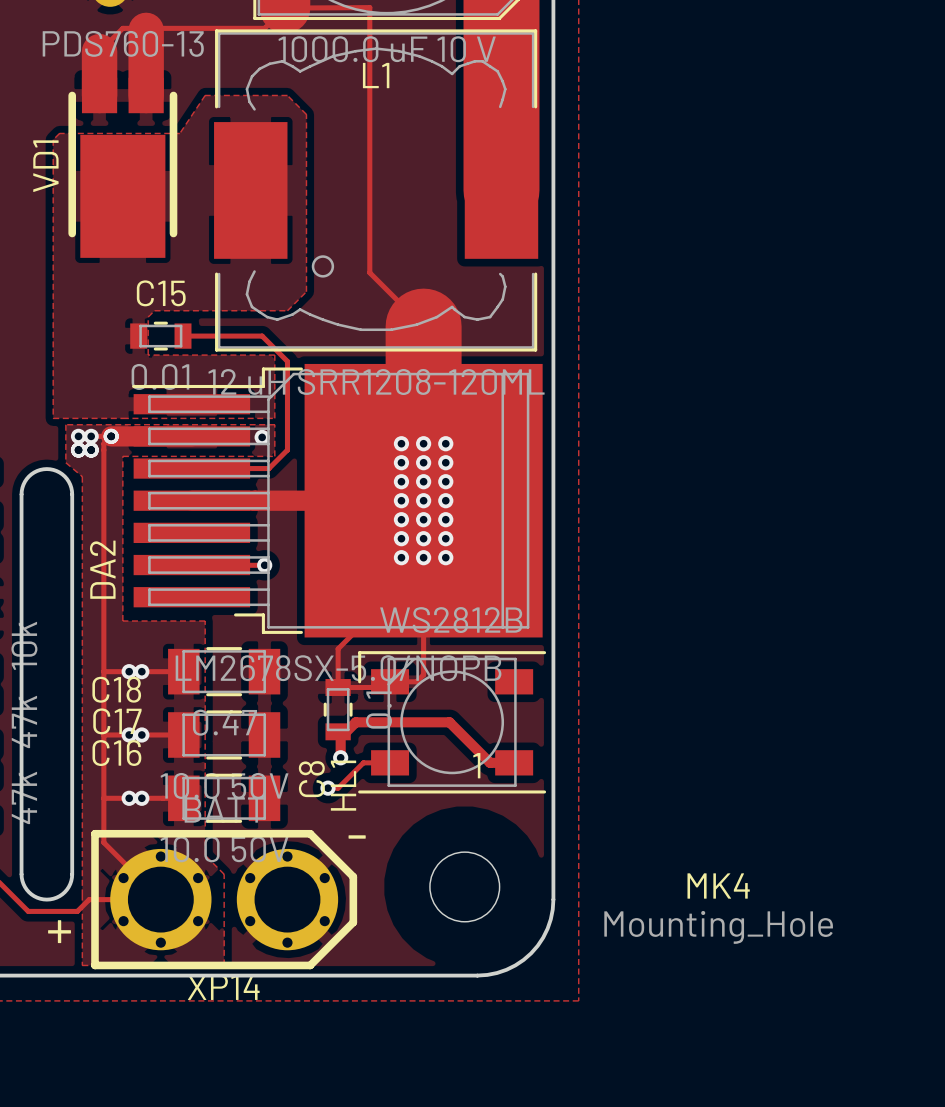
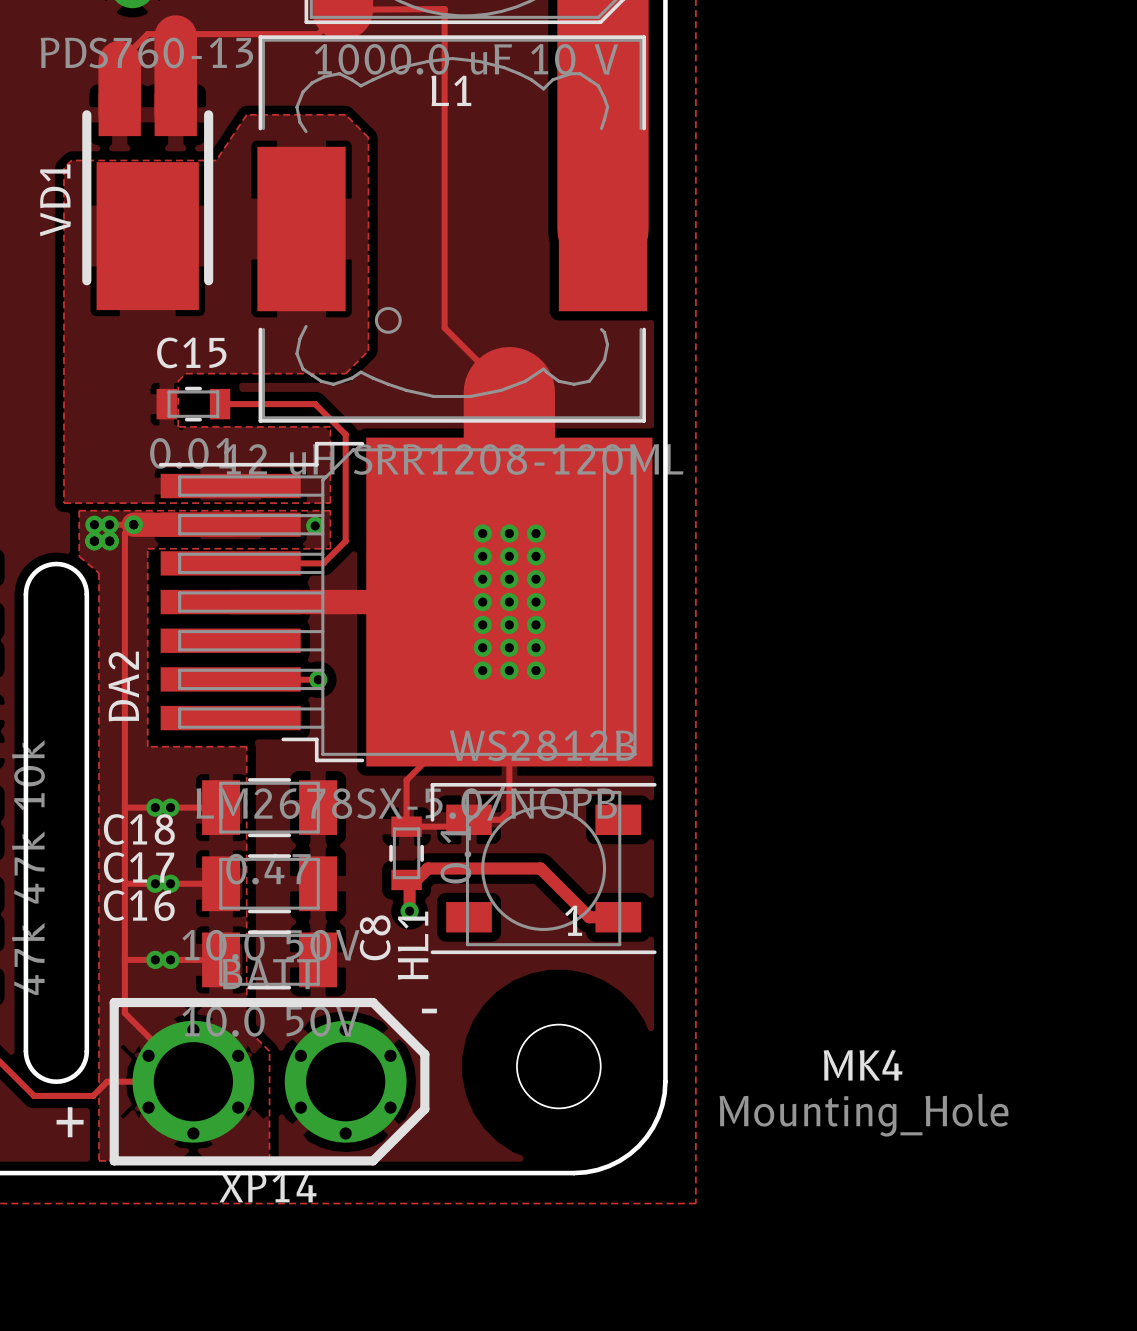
track: (390, 762) (363, 762) (338, 788) (328, 788) -> none
via: (328, 788) -> none

